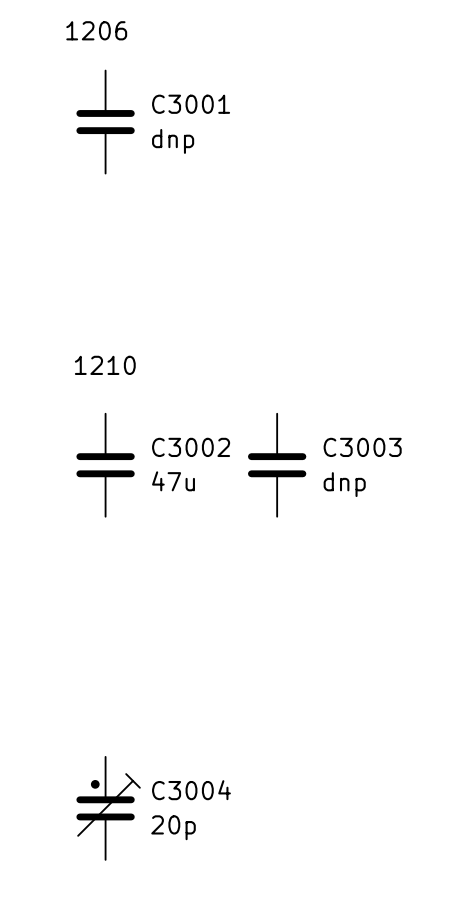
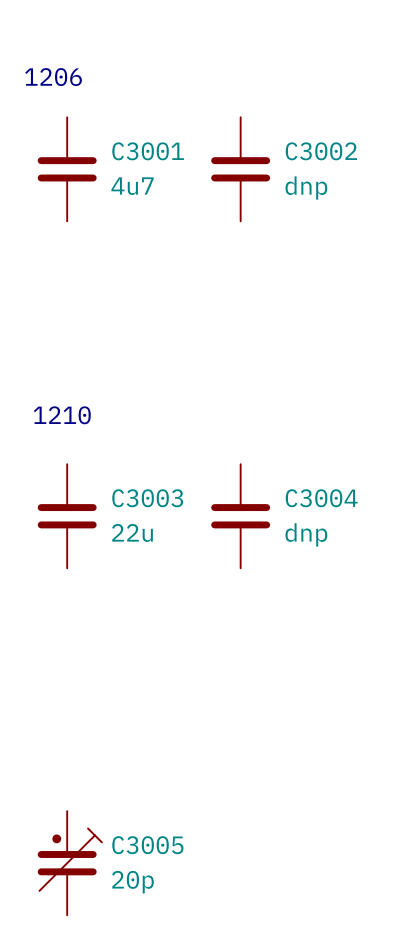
C3002: none -> dnp (240, 169)
C3001 value: dnp (173, 141) -> 4u7 (132, 186)
C3002 name: C3002 (191, 447) -> C3003 (147, 498)
C3003 name: C3003 (362, 447) -> C3004 (321, 498)
C3002 value: 47u (173, 481) -> 22u (132, 532)
C3004 name: C3004 (191, 790) -> C3005 (147, 845)

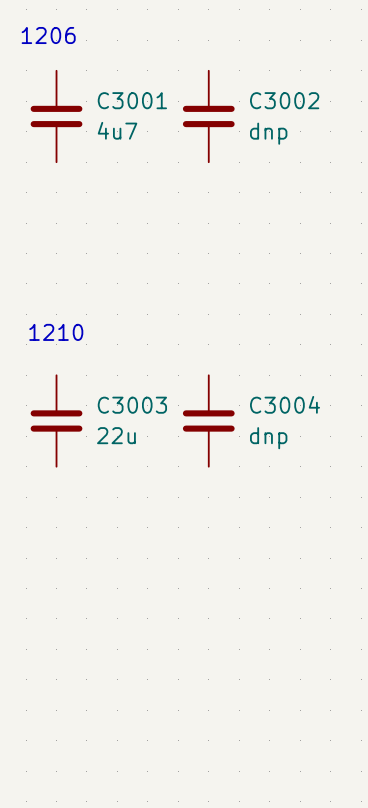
C3005: 20p (69, 863) -> none

